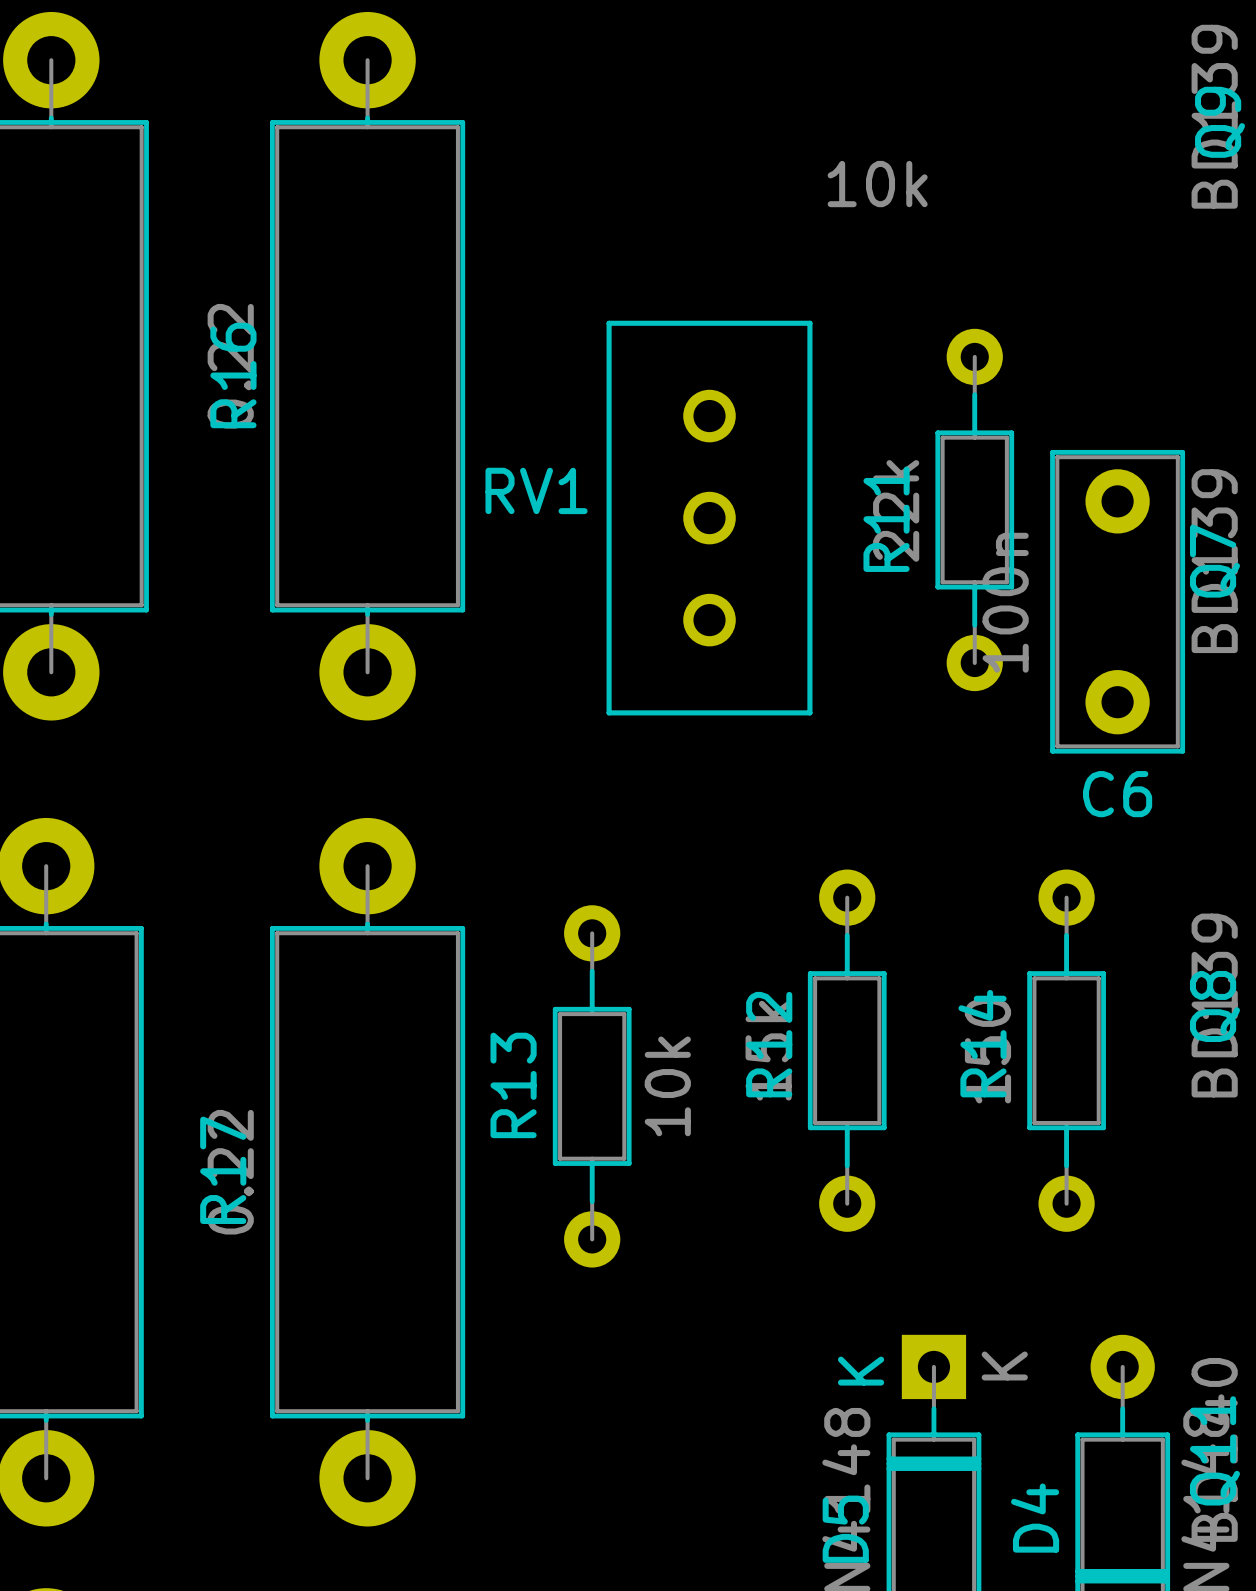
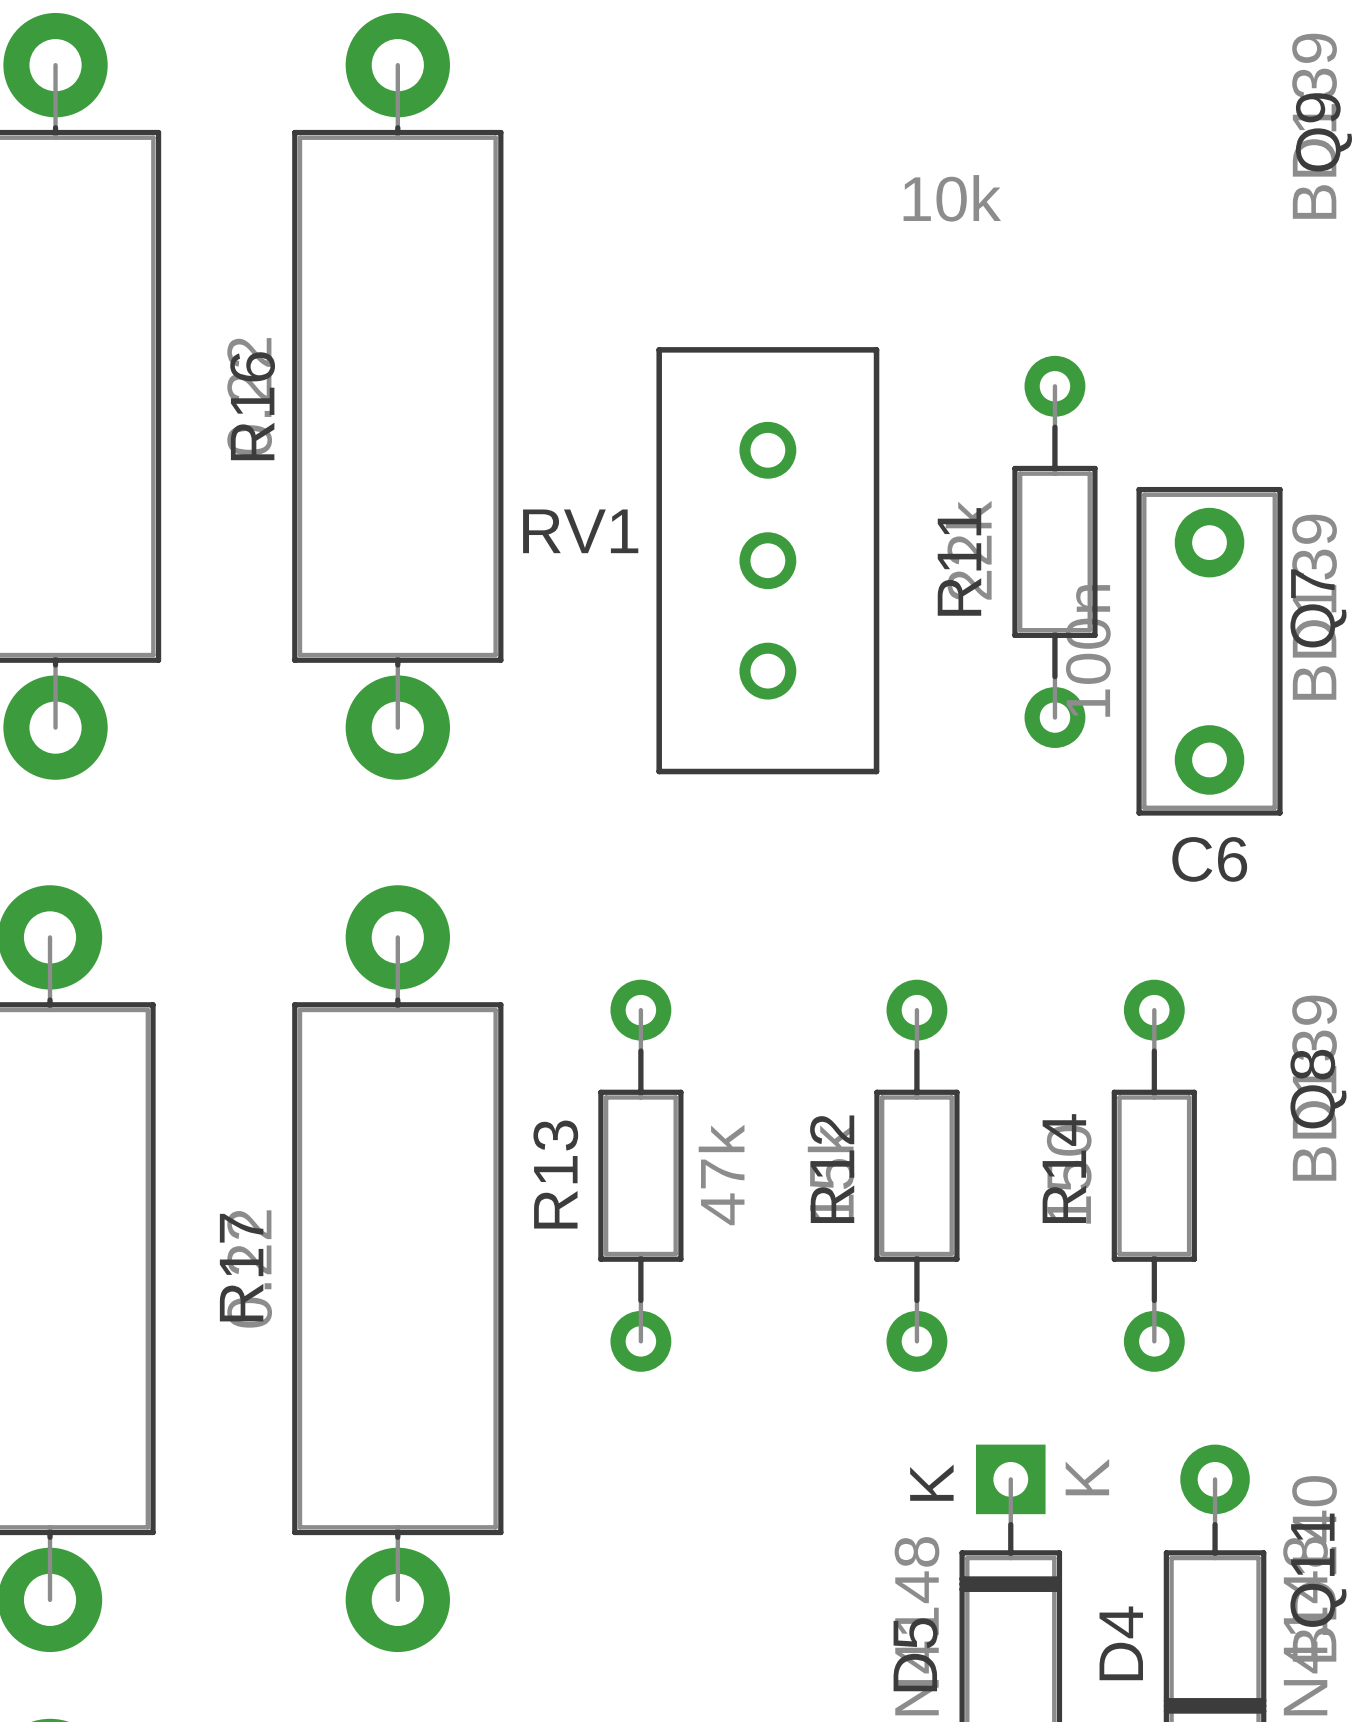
R12 position: (847, 1050) -> (916, 1175)
R14 position: (1066, 1050) -> (1154, 1175)
R13 value: 10k (667, 1086) -> 47k (721, 1174)

